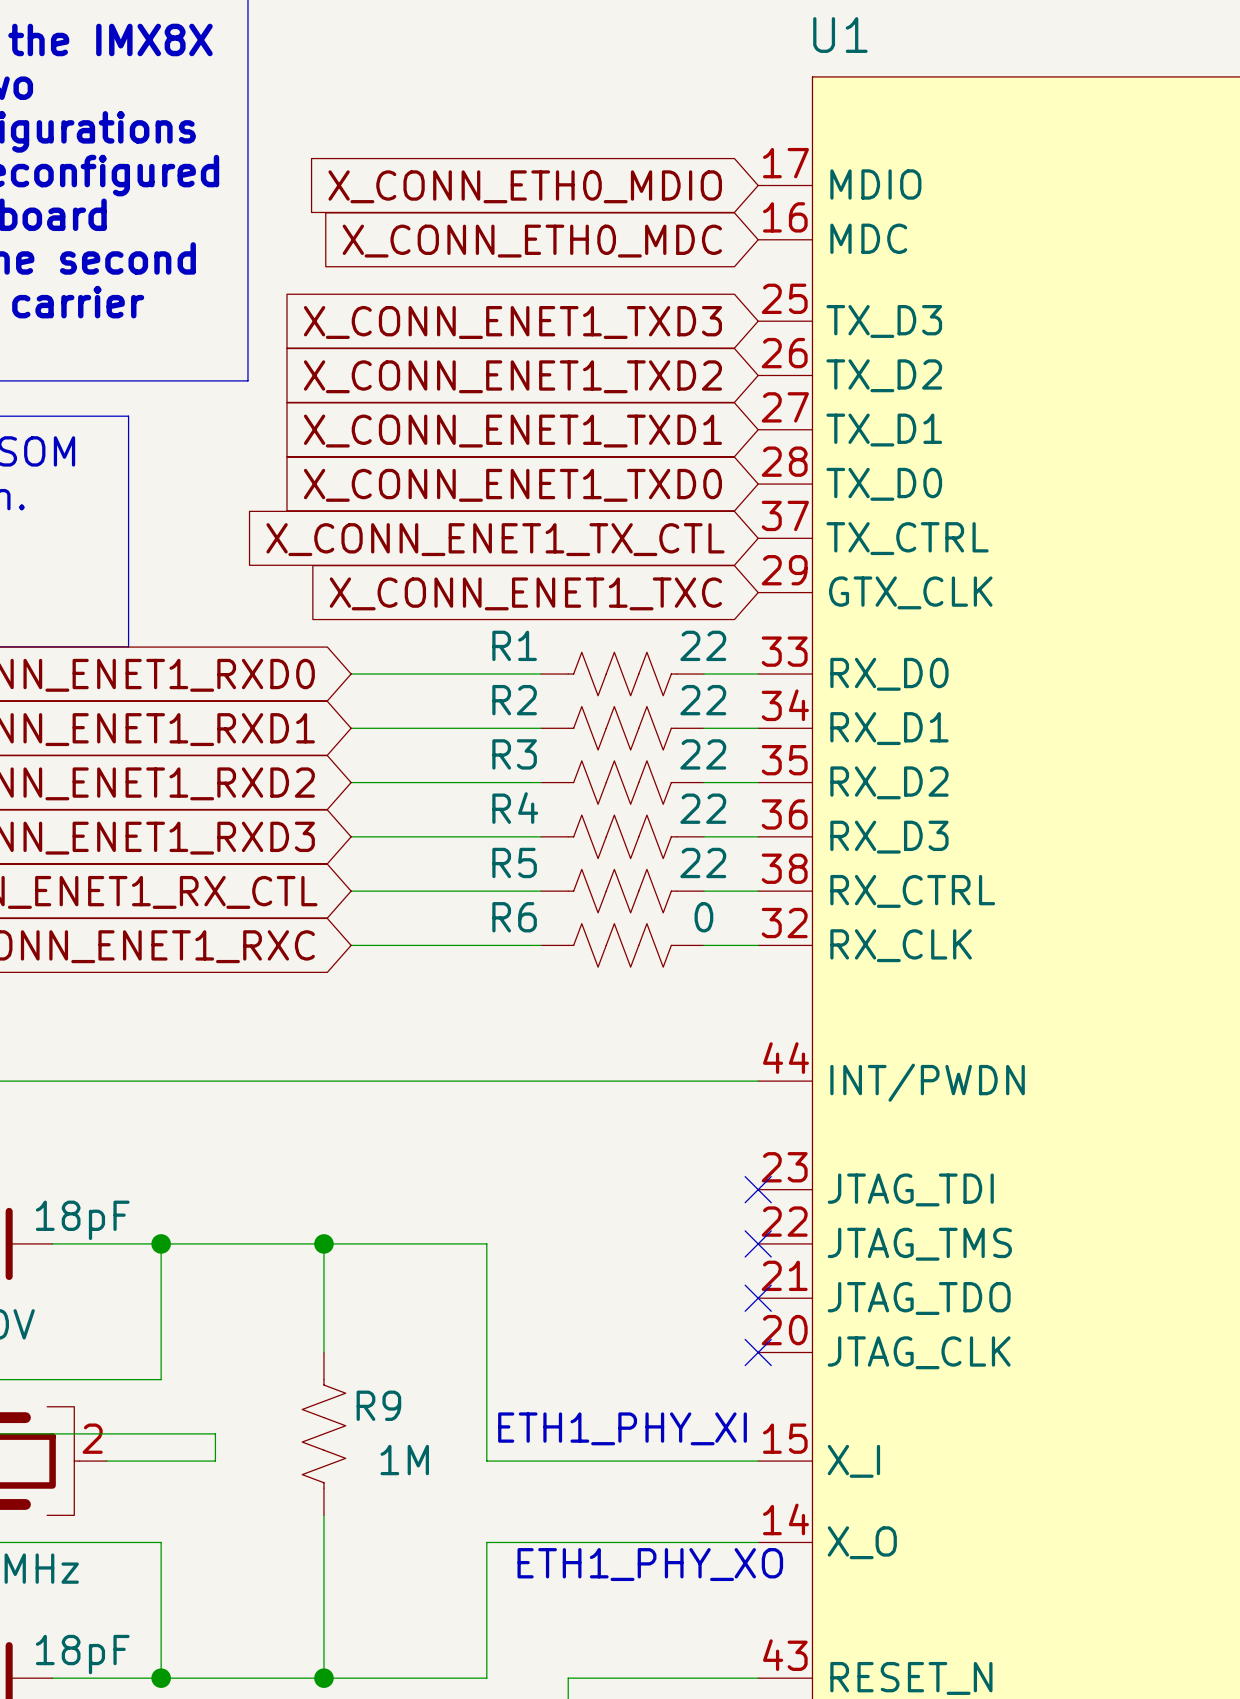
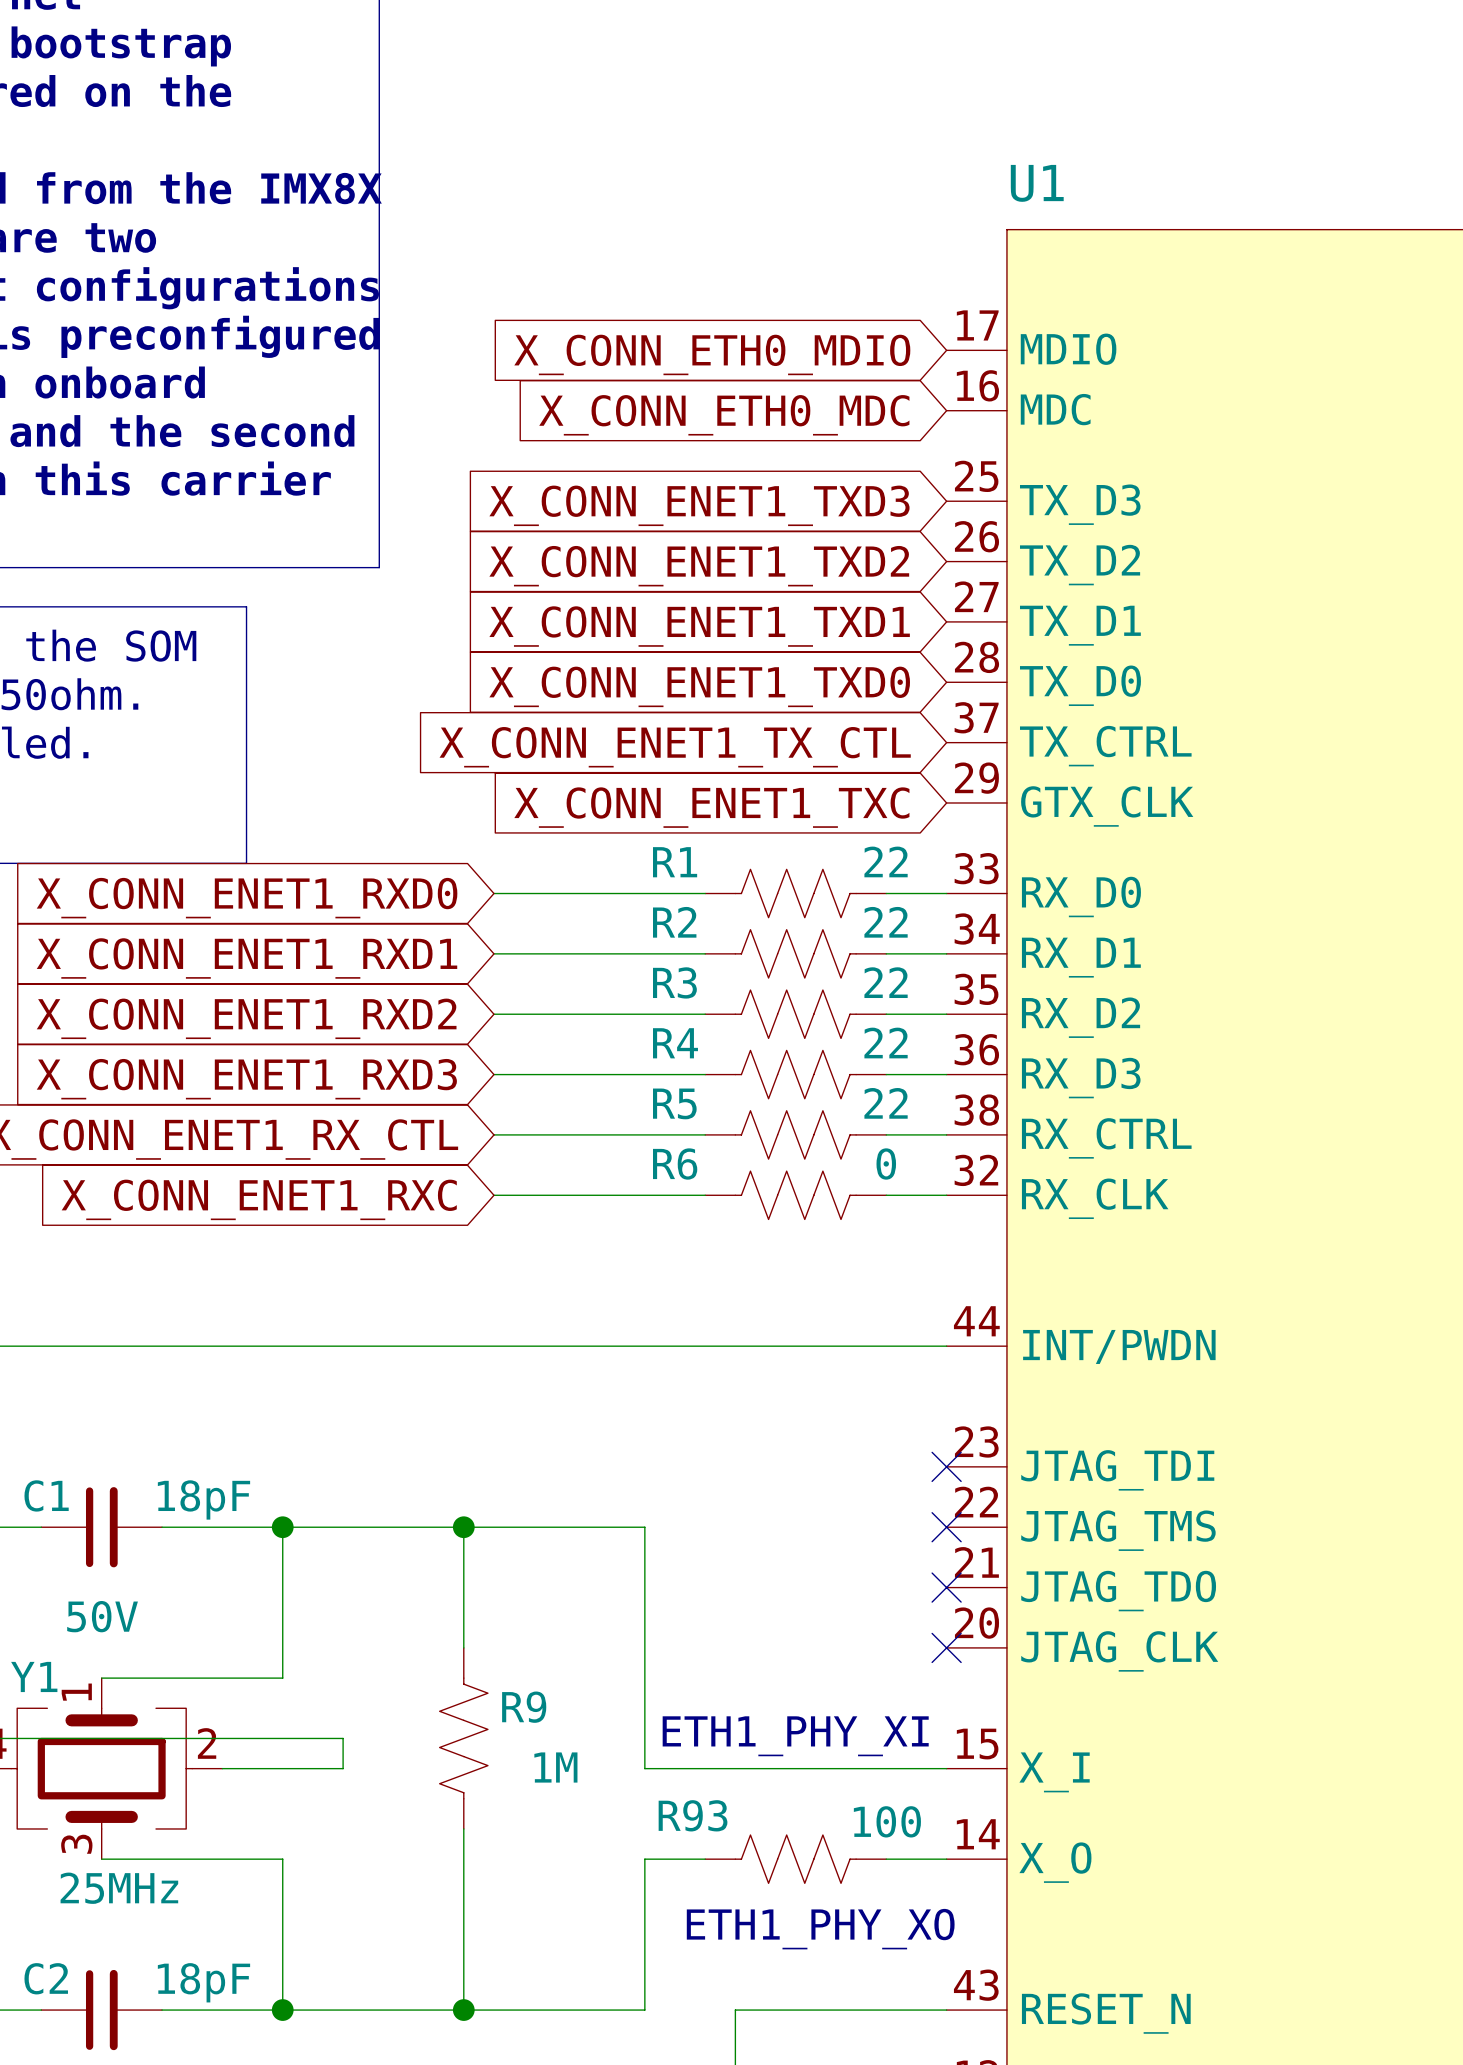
wire: (541, 1542) (703, 1542) -> none
R93: none -> 100 (795, 1859)
text position: ETH1_PHY_XO (650, 1564) -> ETH1_PHY_XO (820, 1929)

